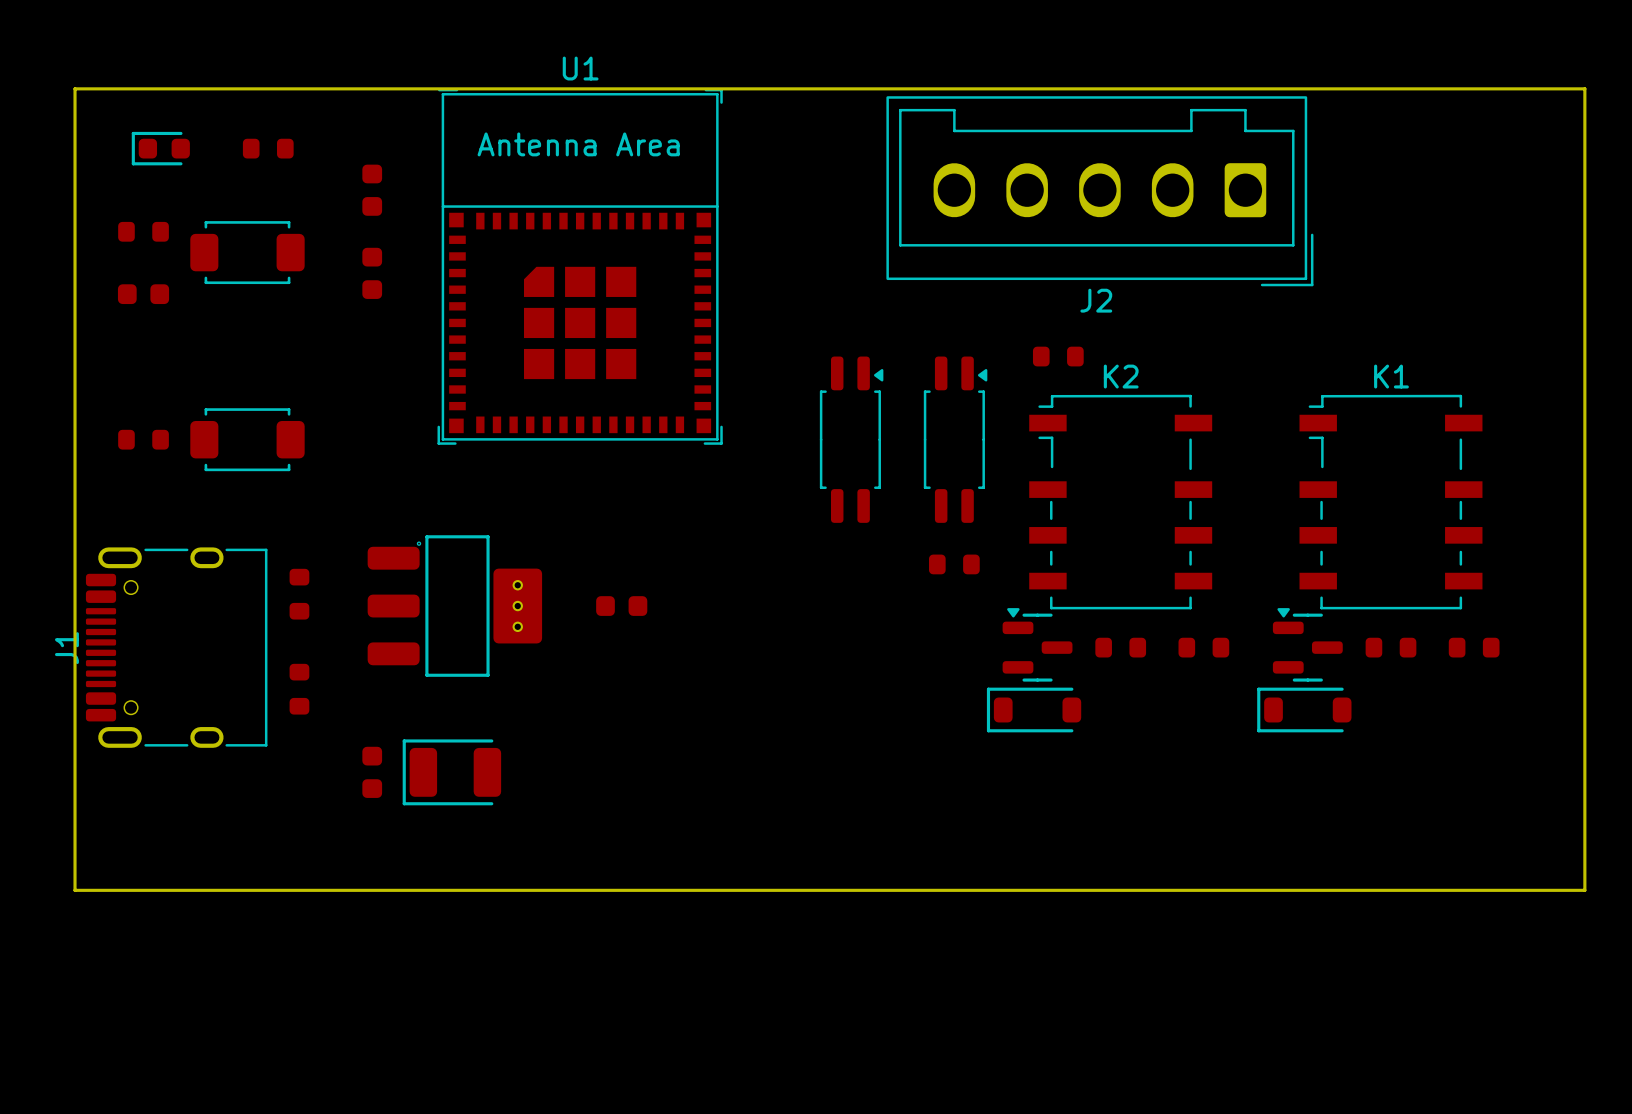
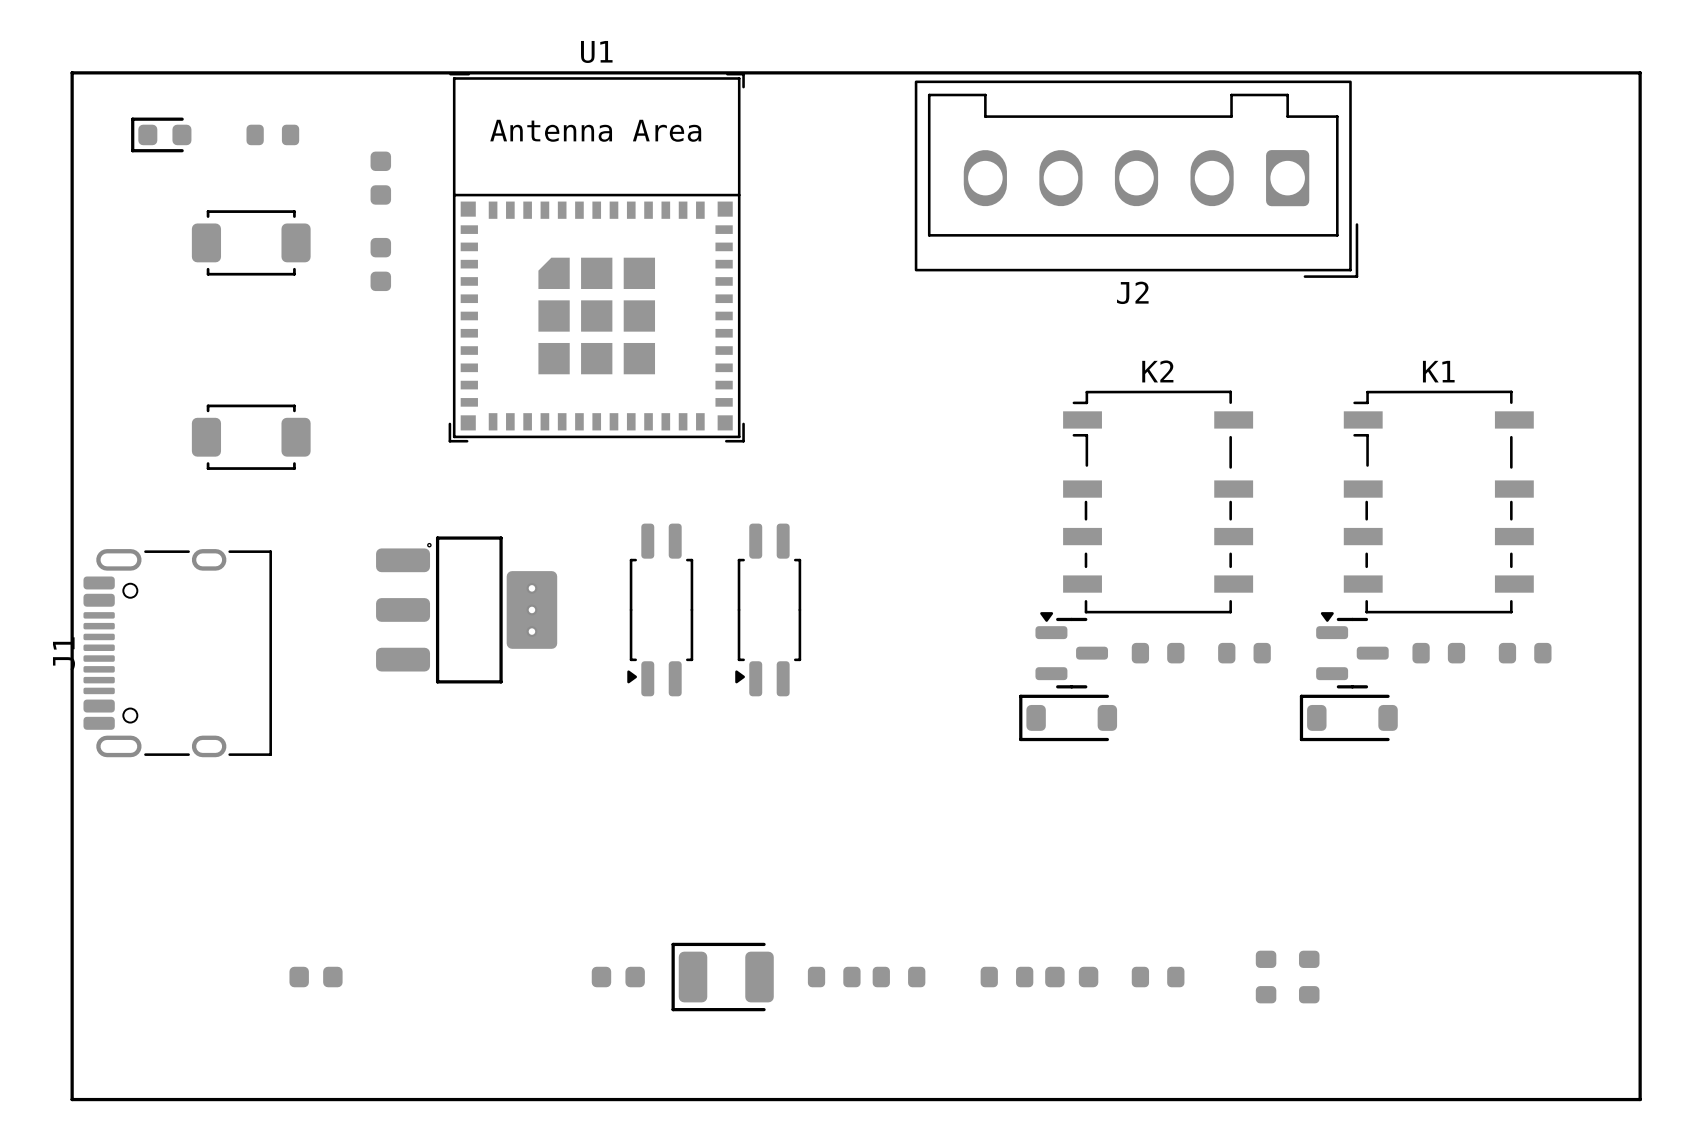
part: (143, 231) -> none
part: (143, 294) -> none
part: (1058, 356) -> none
part: (143, 439) -> none
part: (851, 439) -> none
part: (955, 439) -> none
part: (954, 564) -> none
part: (299, 594) -> none
part footprint: [596, 596, 648, 616] -> [627, 523, 694, 697]
part: none -> (768, 609)
part: (299, 689) -> none
part: (372, 772) -> none
part position: (451, 772) -> (722, 977)
board edge: (75, 890) (1584, 890) -> (72, 905) (72, 1099) (1640, 1099) (1640, 905)
part: none -> (316, 977)
part: none -> (618, 977)
part: none -> (834, 977)
part: none -> (899, 977)
part: none -> (1006, 977)
part: none -> (1071, 977)
part: none -> (1158, 977)
part: none -> (1266, 977)
part: none -> (1309, 977)

